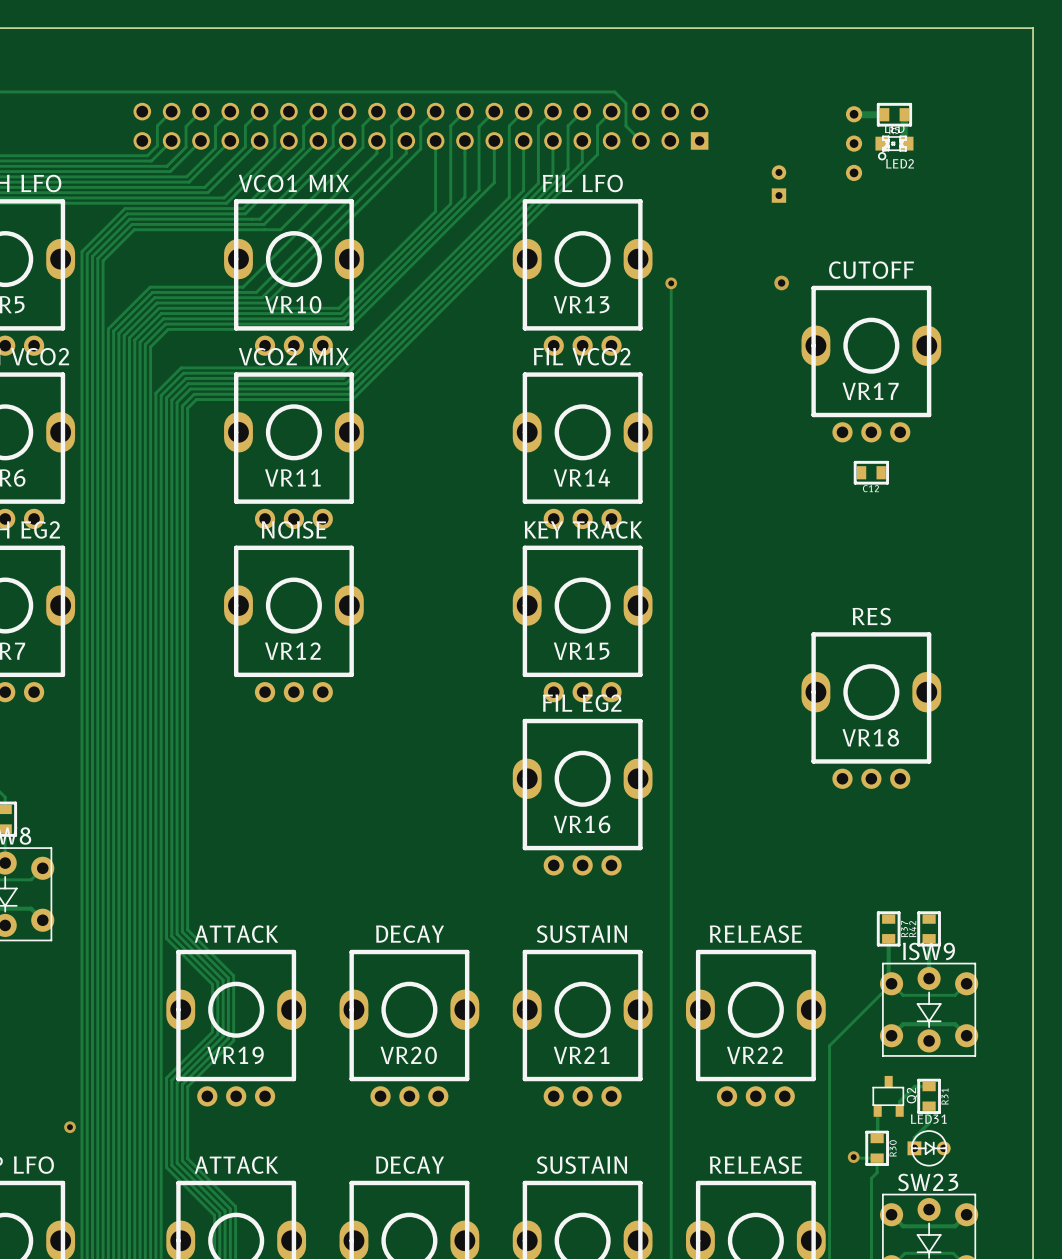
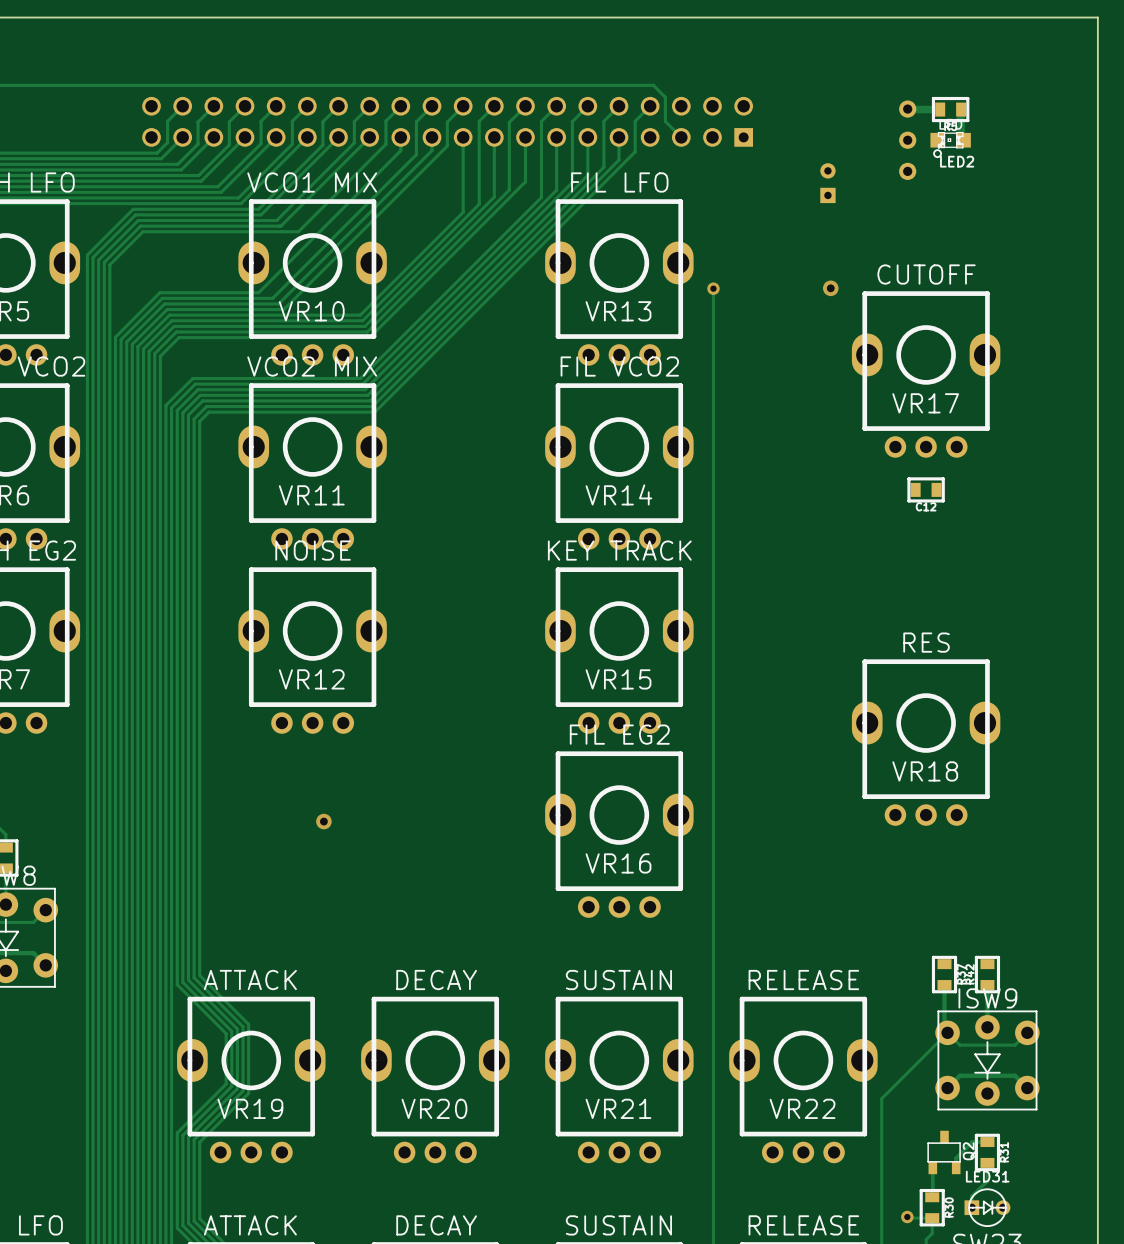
via: none -> (323, 821)
via: (70, 1127) -> none

